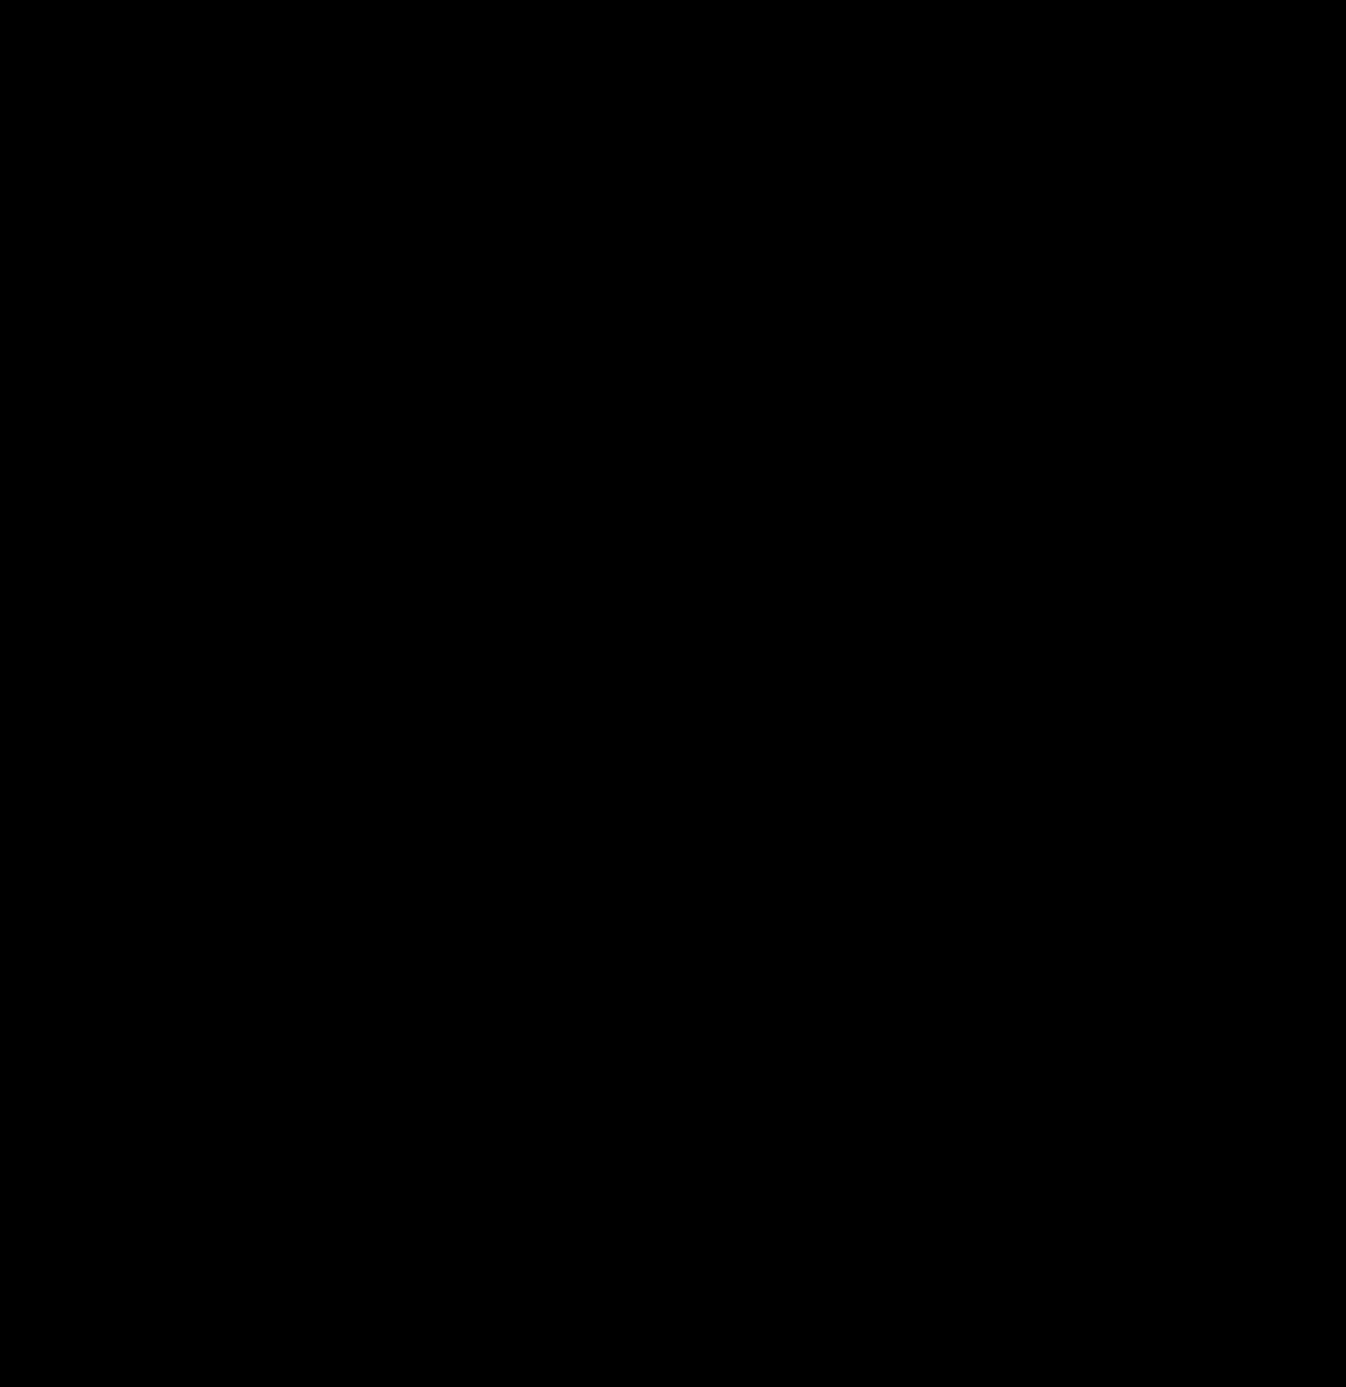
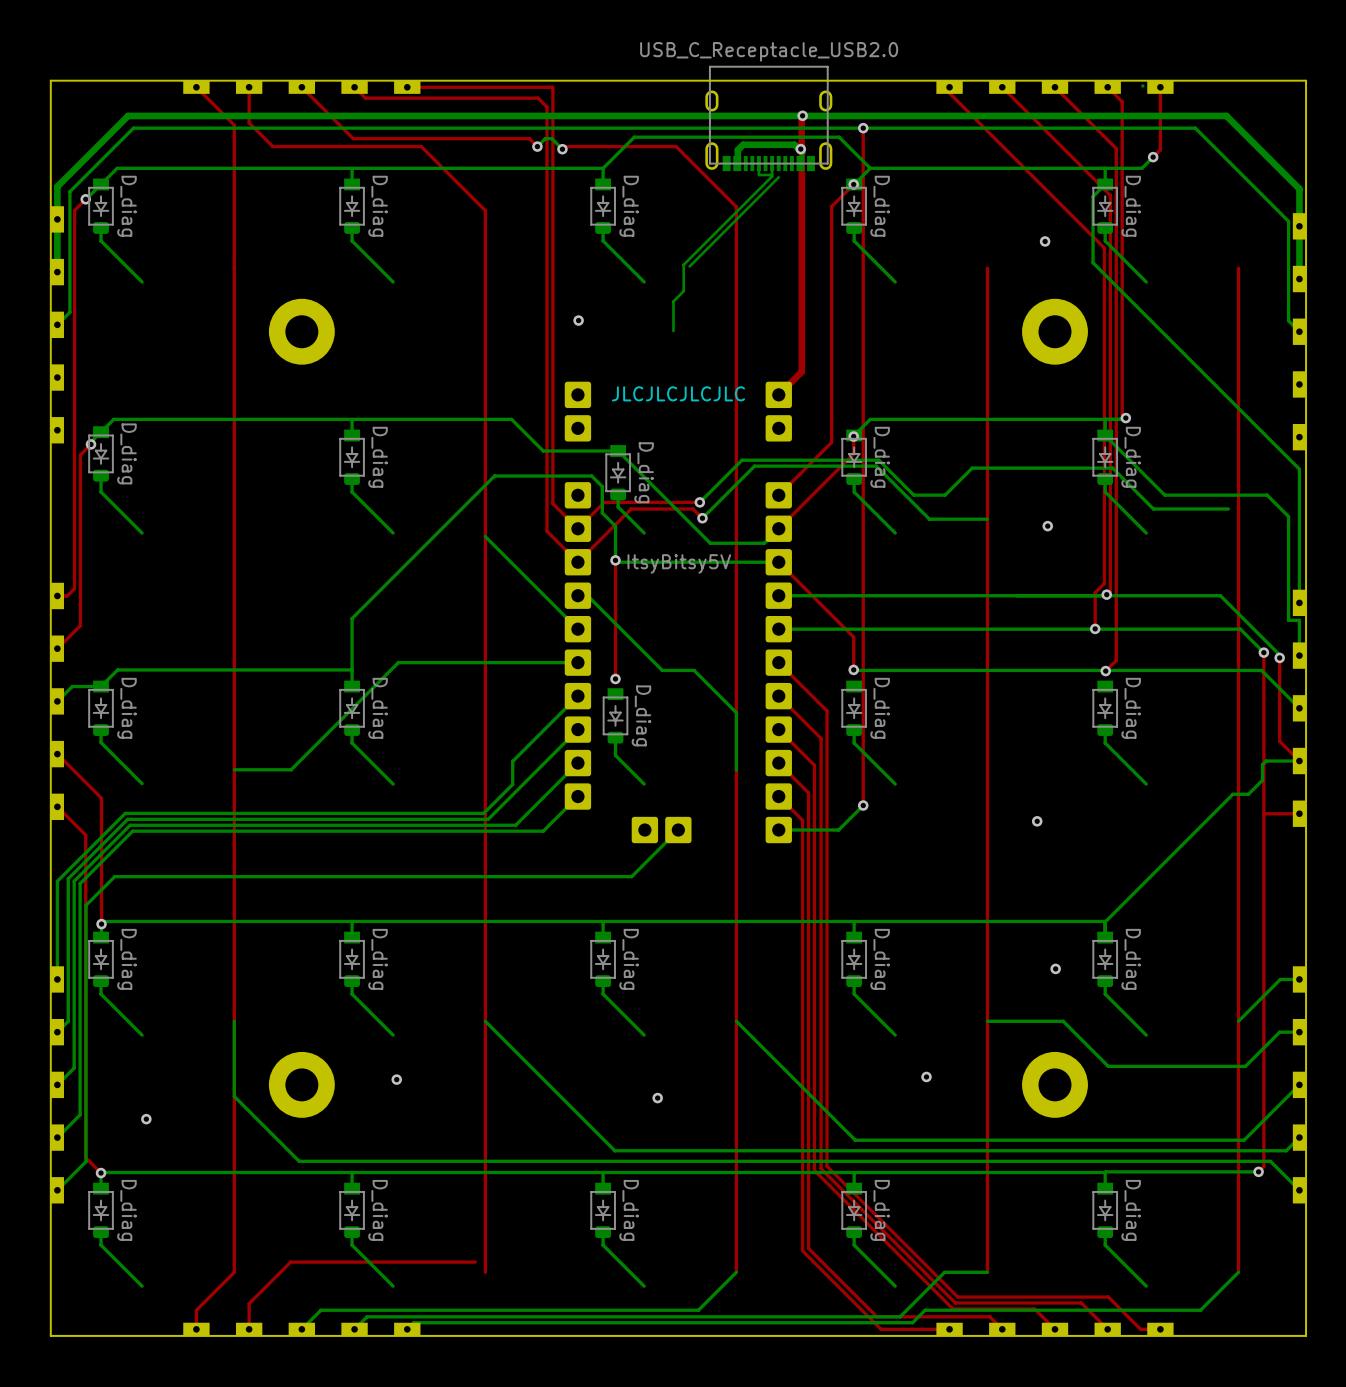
board edge: none -> (1306, 80) (50, 80) (50, 1335) (1306, 1335) (1306, 80)
bottom track: none -> (1142, 85) (1142, 85)
top track: none -> (196, 87) (234, 125) (234, 1272) (196, 1310) (196, 1329)
top track: none -> (249, 87) (249, 122) (272, 146) (421, 146) (485, 210) (485, 1272)
top track: none -> (301, 87) (353, 138) (529, 138) (537, 146)
part: none -> (301, 87)
top track: none -> (354, 87) (365, 98) (538, 98) (546, 107) (546, 531) (577, 562) (631, 509) (692, 509) (702, 518)
top track: none -> (407, 87) (552, 87) (552, 503) (577, 528) (604, 502) (699, 502)
top track: none -> (949, 87) (949, 93) (1104, 248) (1104, 583) (1095, 592) (1095, 628)
top track: none -> (1002, 87) (1110, 195) (1110, 591) (1106, 594)
top track: none -> (1054, 87) (1116, 148) (1116, 660) (1105, 671)
part: none -> (1054, 87)
top track: none -> (1107, 87) (1122, 101) (1122, 414) (1125, 418)
top track: none -> (1160, 87) (1160, 149) (1153, 157)
top track: none -> (802, 115) (800, 149) (801, 371) (778, 394)
via: none -> (802, 115)
part: none -> USB_C_Receptacle_USB2.0 (768, 118)
top track: none -> (863, 128) (863, 805)
via: none -> (863, 128)
bottom track: none -> (537, 146) (545, 138) (551, 138) (562, 149)
via: none -> (537, 146)
top track: none -> (562, 149) (565, 146) (676, 146) (736, 206) (736, 1272)
via: none -> (562, 149)
via: none -> (800, 149)
bottom track: none -> (802, 152) (794, 144) (743, 144) (737, 150) (737, 160)
bottom track: none -> (1153, 157) (1141, 168) (870, 168)
via: none -> (1153, 157)
bottom track: none -> (758, 163) (759, 175) (772, 174)
bottom track: none -> (772, 163) (772, 176) (683, 264) (683, 291) (673, 301) (673, 331)
bottom track: none -> (352, 168) (352, 184)
bottom track: none -> (603, 168) (603, 184)
bottom track: none -> (603, 168) (117, 168) (85, 199)
bottom track: none -> (870, 168) (839, 137) (634, 137) (603, 168)
bottom track: none -> (870, 168) (854, 184)
bottom track: none -> (1105, 168) (1105, 184) (1093, 196) (1093, 262) (1299, 469) (1299, 602)
bottom track: none -> (778, 177) (689, 266)
top track: none -> (853, 184) (831, 206) (831, 442) (778, 495)
via: none -> (853, 184)
top track: none -> (85, 199) (74, 210) (74, 588) (67, 595) (57, 595)
via: none -> (85, 199)
part: none -> D_diag (101, 206)
part: none -> D_diag (352, 206)
part: none -> D_diag (603, 206)
part: none -> D_diag (854, 206)
part: none -> D_diag (1105, 206)
bottom track: none -> (352, 227) (352, 240) (393, 281)
bottom track: none -> (603, 227) (603, 240) (644, 281)
bottom track: none -> (854, 227) (854, 240) (895, 281)
bottom track: none -> (1105, 227) (1105, 240) (1146, 281)
bottom track: none -> (101, 231) (101, 240) (142, 281)
via: none -> (1045, 241)
top track: none -> (987, 268) (987, 1272)
top track: none -> (1238, 268) (1238, 1272)
bottom track: none -> (57, 272) (57, 186) (128, 115) (1226, 115) (1299, 188) (1299, 279)
via: none -> (578, 320)
bottom track: none -> (57, 324) (69, 312) (69, 191) (133, 128) (1195, 128) (1288, 221) (1288, 320) (1299, 331)
part: none -> (57, 324)
part: none -> (301, 331)
part: none -> (1054, 331)
part: none -> (1299, 331)
text: none -> JLCJLCJLCJLC (678, 393)
bottom track: none -> (1125, 418) (870, 419) (854, 435)
via: none -> (1125, 418)
bottom track: none -> (352, 419) (352, 435)
bottom track: none -> (1105, 419) (1105, 435) (1164, 495) (1267, 495) (1288, 516) (1288, 620) (1299, 620) (1299, 655)
top track: none -> (853, 436) (853, 453) (778, 528)
via: none -> (853, 436)
bottom track: none -> (91, 444) (91, 442) (113, 419) (511, 419) (543, 451) (618, 451) (710, 543) (764, 543) (778, 528)
top track: none -> (91, 444) (80, 454) (80, 625) (57, 648)
via: none -> (91, 444)
part: none -> D_diag (101, 453)
part: none -> D_diag (352, 457)
part: none -> D_diag (854, 457)
part: none -> D_diag (1105, 457)
part: none -> D_diag (618, 472)
bottom track: none -> (101, 475) (101, 491) (142, 533)
bottom track: none -> (352, 479) (352, 491) (393, 533)
bottom track: none -> (854, 479) (854, 491) (895, 533)
bottom track: none -> (1105, 479) (1105, 491) (1146, 533)
bottom track: none -> (618, 494) (618, 507) (644, 533)
bottom track: none -> (699, 502) (742, 460) (878, 460) (913, 495) (945, 495) (972, 468) (1112, 468) (1153, 509) (1228, 509)
via: none -> (699, 502)
bottom track: none -> (702, 518) (754, 466) (876, 466) (929, 519) (987, 519)
via: none -> (702, 518)
via: none -> (1047, 526)
bottom track: none -> (485, 536) (577, 629)
top track: none -> (615, 560) (615, 678)
via: none -> (615, 560)
bottom track: none -> (617, 562) (615, 560) (615, 526) (602, 512) (602, 486) (591, 476) (494, 476) (352, 618) (352, 686)
bottom track: none -> (778, 562) (615, 562)
top track: none -> (778, 562) (853, 637) (853, 669)
via: none -> (1106, 594)
bottom track: none -> (587, 595) (662, 670) (694, 670) (736, 712) (736, 770)
bottom track: none -> (778, 595) (1220, 595) (1279, 654) (1279, 657)
part: none -> ItsyBitsy5V (678, 612)
via: none -> (1095, 628)
bottom track: none -> (778, 629) (1240, 629) (1263, 652)
top track: none -> (1263, 652) (1263, 1166) (1258, 1171)
via: none -> (1263, 652)
top track: none -> (1279, 657) (1279, 741) (1299, 761)
via: none -> (1279, 657)
bottom track: none -> (577, 662) (398, 662) (291, 769) (234, 769)
top track: none -> (778, 662) (827, 710) (827, 1166) (957, 1297) (1108, 1297) (1140, 1329) (1160, 1329)
bottom track: none -> (352, 669) (117, 669) (101, 686) (72, 686) (57, 701)
via: none -> (853, 669)
bottom track: none -> (854, 670) (1261, 670) (1299, 708)
via: none -> (1105, 671)
via: none -> (615, 678)
bottom track: none -> (577, 696) (512, 761) (512, 784) (483, 813) (125, 813) (57, 881) (57, 979)
top track: none -> (778, 696) (821, 738) (821, 1168) (955, 1302) (1081, 1302) (1107, 1329)
part: none -> (57, 701)
part: none -> D_diag (101, 708)
part: none -> D_diag (352, 708)
part: none -> D_diag (854, 708)
part: none -> D_diag (1105, 708)
part: none -> (1299, 708)
part: none -> D_diag (615, 715)
bottom track: none -> (577, 729) (488, 819) (127, 819) (68, 878) (68, 1021) (57, 1032)
top track: none -> (778, 729) (814, 765) (814, 1170) (952, 1308) (1034, 1308) (1054, 1329)
bottom track: none -> (101, 730) (101, 742) (142, 783)
bottom track: none -> (352, 730) (352, 743) (393, 784)
bottom track: none -> (854, 730) (854, 743) (895, 784)
bottom track: none -> (1105, 730) (1105, 743) (1146, 784)
bottom track: none -> (615, 737) (615, 755) (644, 784)
top track: none -> (57, 754) (101, 798) (101, 924)
bottom track: none -> (1299, 761) (1266, 761) (1262, 764) (1262, 780) (1248, 794) (1232, 794) (1105, 922)
bottom track: none -> (577, 763) (515, 825) (130, 825) (74, 881) (74, 1068) (57, 1084)
top track: none -> (778, 763) (808, 792) (808, 1248) (876, 1316) (989, 1316) (1002, 1329)
bottom track: none -> (577, 796) (543, 831) (132, 831) (80, 883) (80, 1114) (57, 1137)
top track: none -> (778, 796) (802, 820) (802, 1250) (881, 1329) (949, 1329)
bottom track: none -> (863, 805) (838, 830) (778, 830)
via: none -> (863, 805)
top track: none -> (57, 806) (85, 835) (85, 1157) (101, 1173)
top track: none -> (1299, 813) (1263, 813)
via: none -> (1037, 821)
bottom track: none -> (678, 830) (631, 876) (114, 876) (86, 905) (86, 1161) (57, 1190)
bottom track: none -> (352, 921) (352, 937)
bottom track: none -> (603, 921) (603, 937)
bottom track: none -> (854, 921) (854, 937)
via: none -> (101, 924)
bottom track: none -> (101, 937) (101, 924) (104, 921) (1105, 921) (1105, 937)
part: none -> D_diag (101, 959)
part: none -> D_diag (352, 959)
part: none -> D_diag (603, 959)
part: none -> D_diag (854, 959)
part: none -> D_diag (1105, 959)
via: none -> (1055, 968)
bottom track: none -> (1299, 979) (1280, 979) (1238, 1021)
bottom track: none -> (101, 981) (101, 994) (142, 1035)
bottom track: none -> (352, 981) (352, 994) (393, 1035)
bottom track: none -> (603, 981) (603, 994) (644, 1035)
bottom track: none -> (854, 981) (854, 994) (895, 1035)
bottom track: none -> (1105, 981) (1105, 994) (1146, 1035)
bottom track: none -> (234, 1021) (234, 1096) (299, 1161) (1270, 1161) (1299, 1190)
bottom track: none -> (485, 1021) (614, 1150) (1286, 1150) (1299, 1137)
bottom track: none -> (736, 1021) (855, 1140) (1244, 1140) (1299, 1084)
bottom track: none -> (987, 1021) (1063, 1021) (1108, 1066) (1245, 1066) (1279, 1032) (1299, 1032)
via: none -> (926, 1076)
via: none -> (396, 1079)
part: none -> (57, 1084)
part: none -> (301, 1084)
part: none -> (1054, 1084)
part: none -> (1299, 1084)
via: none -> (657, 1098)
via: none -> (146, 1119)
bottom track: none -> (1258, 1171) (1105, 1172)
via: none -> (1258, 1171)
bottom track: none -> (352, 1172) (352, 1188)
bottom track: none -> (603, 1172) (603, 1188)
bottom track: none -> (854, 1172) (854, 1188)
bottom track: none -> (1105, 1172) (1105, 1188)
bottom track: none -> (1105, 1172) (101, 1172) (101, 1188)
via: none -> (101, 1173)
part: none -> D_diag (101, 1210)
part: none -> D_diag (352, 1210)
part: none -> D_diag (603, 1210)
part: none -> D_diag (854, 1210)
part: none -> D_diag (1105, 1210)
bottom track: none -> (101, 1232) (101, 1245) (142, 1286)
bottom track: none -> (352, 1232) (352, 1245) (393, 1286)
bottom track: none -> (603, 1232) (603, 1245) (644, 1286)
bottom track: none -> (854, 1232) (854, 1245) (895, 1286)
bottom track: none -> (1105, 1232) (1105, 1245) (1146, 1286)
top track: none -> (475, 1262) (290, 1262) (249, 1303) (249, 1329)
bottom track: none -> (736, 1272) (698, 1310) (320, 1310) (301, 1329)
bottom track: none -> (987, 1272) (944, 1272) (900, 1316) (367, 1316) (354, 1329)
bottom track: none -> (1238, 1272) (1200, 1310) (925, 1310) (912, 1322) (413, 1322) (407, 1329)
part: none -> (301, 1329)
part: none -> (1054, 1329)

